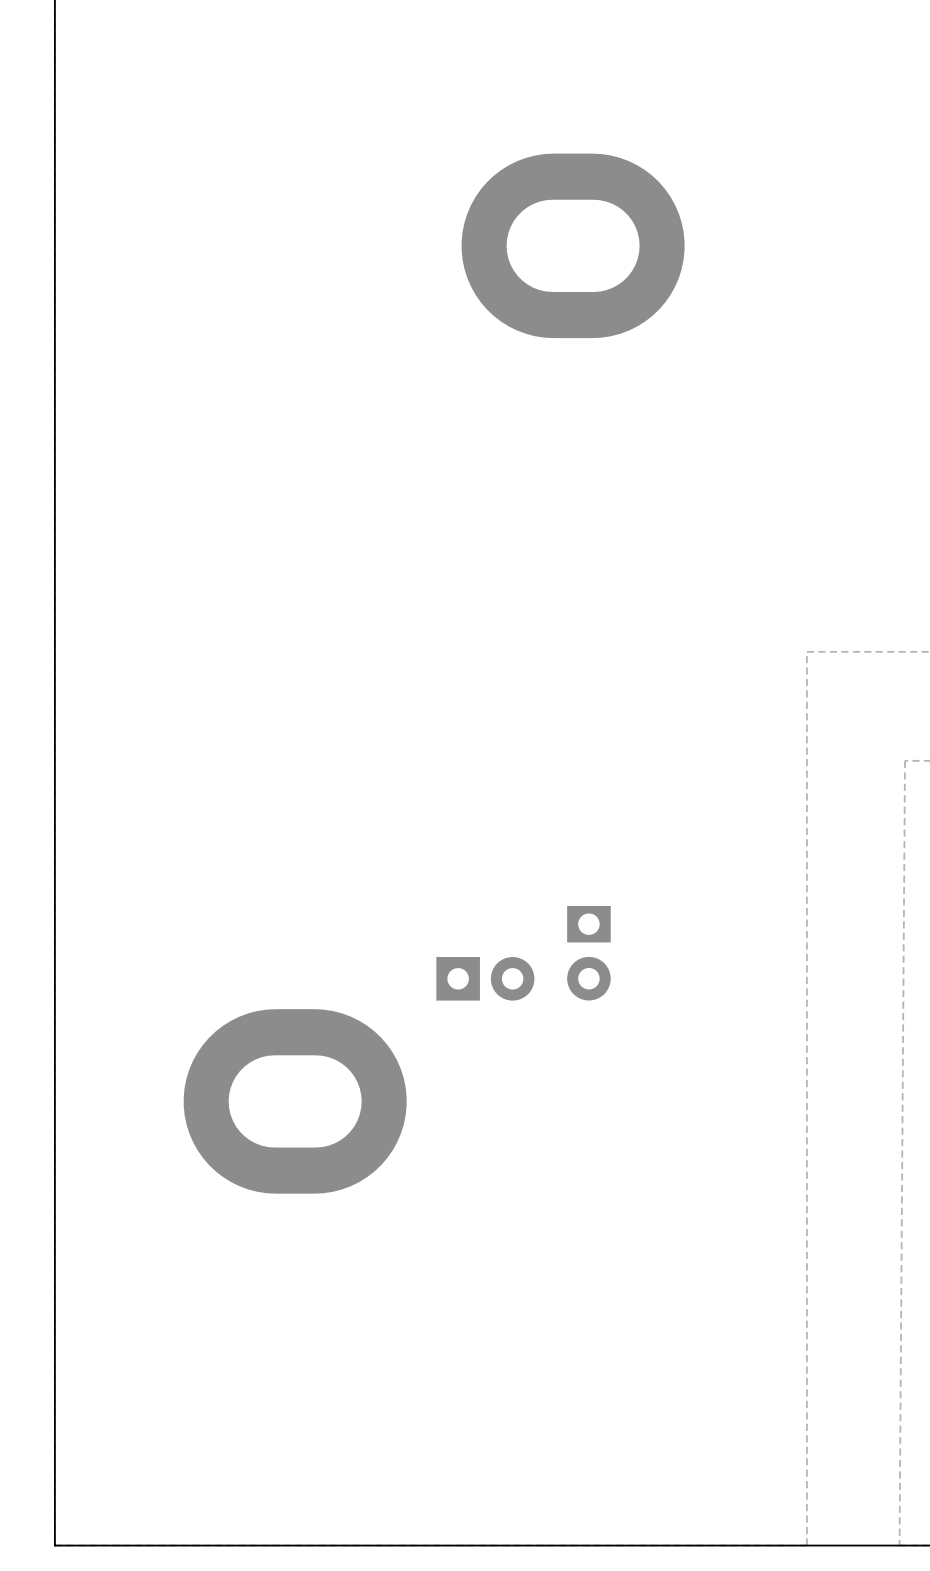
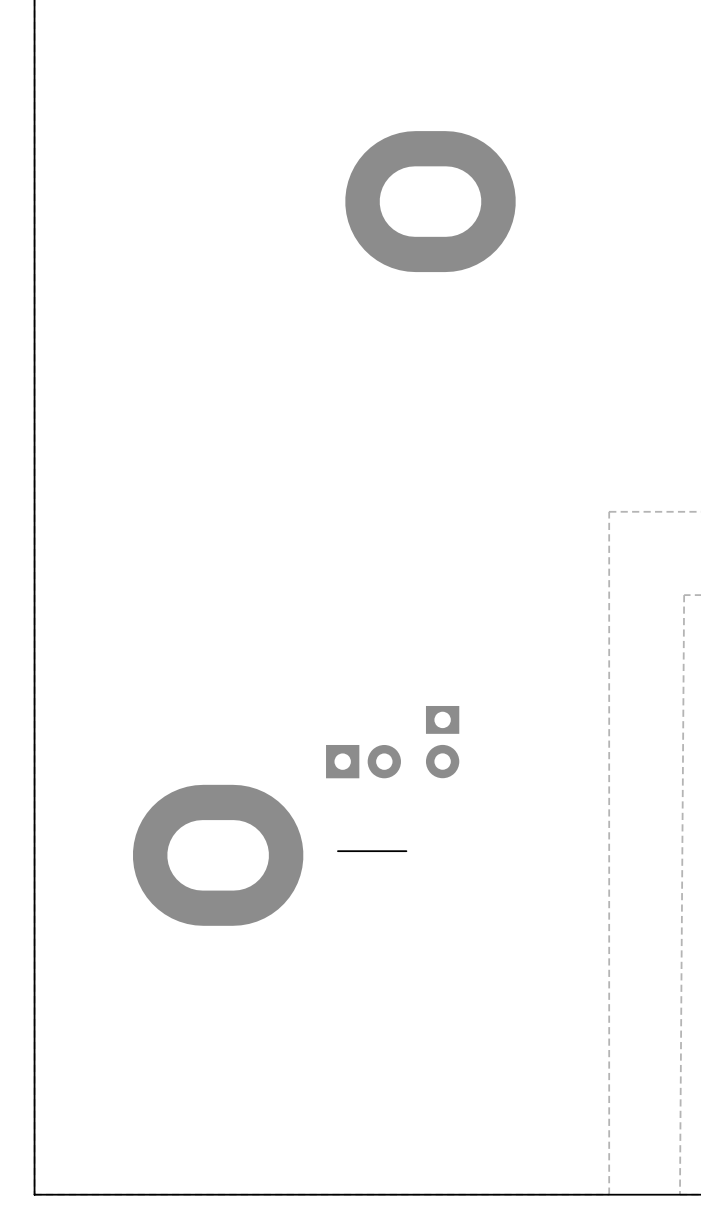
board edge: none -> (406, 851) (337, 851)

